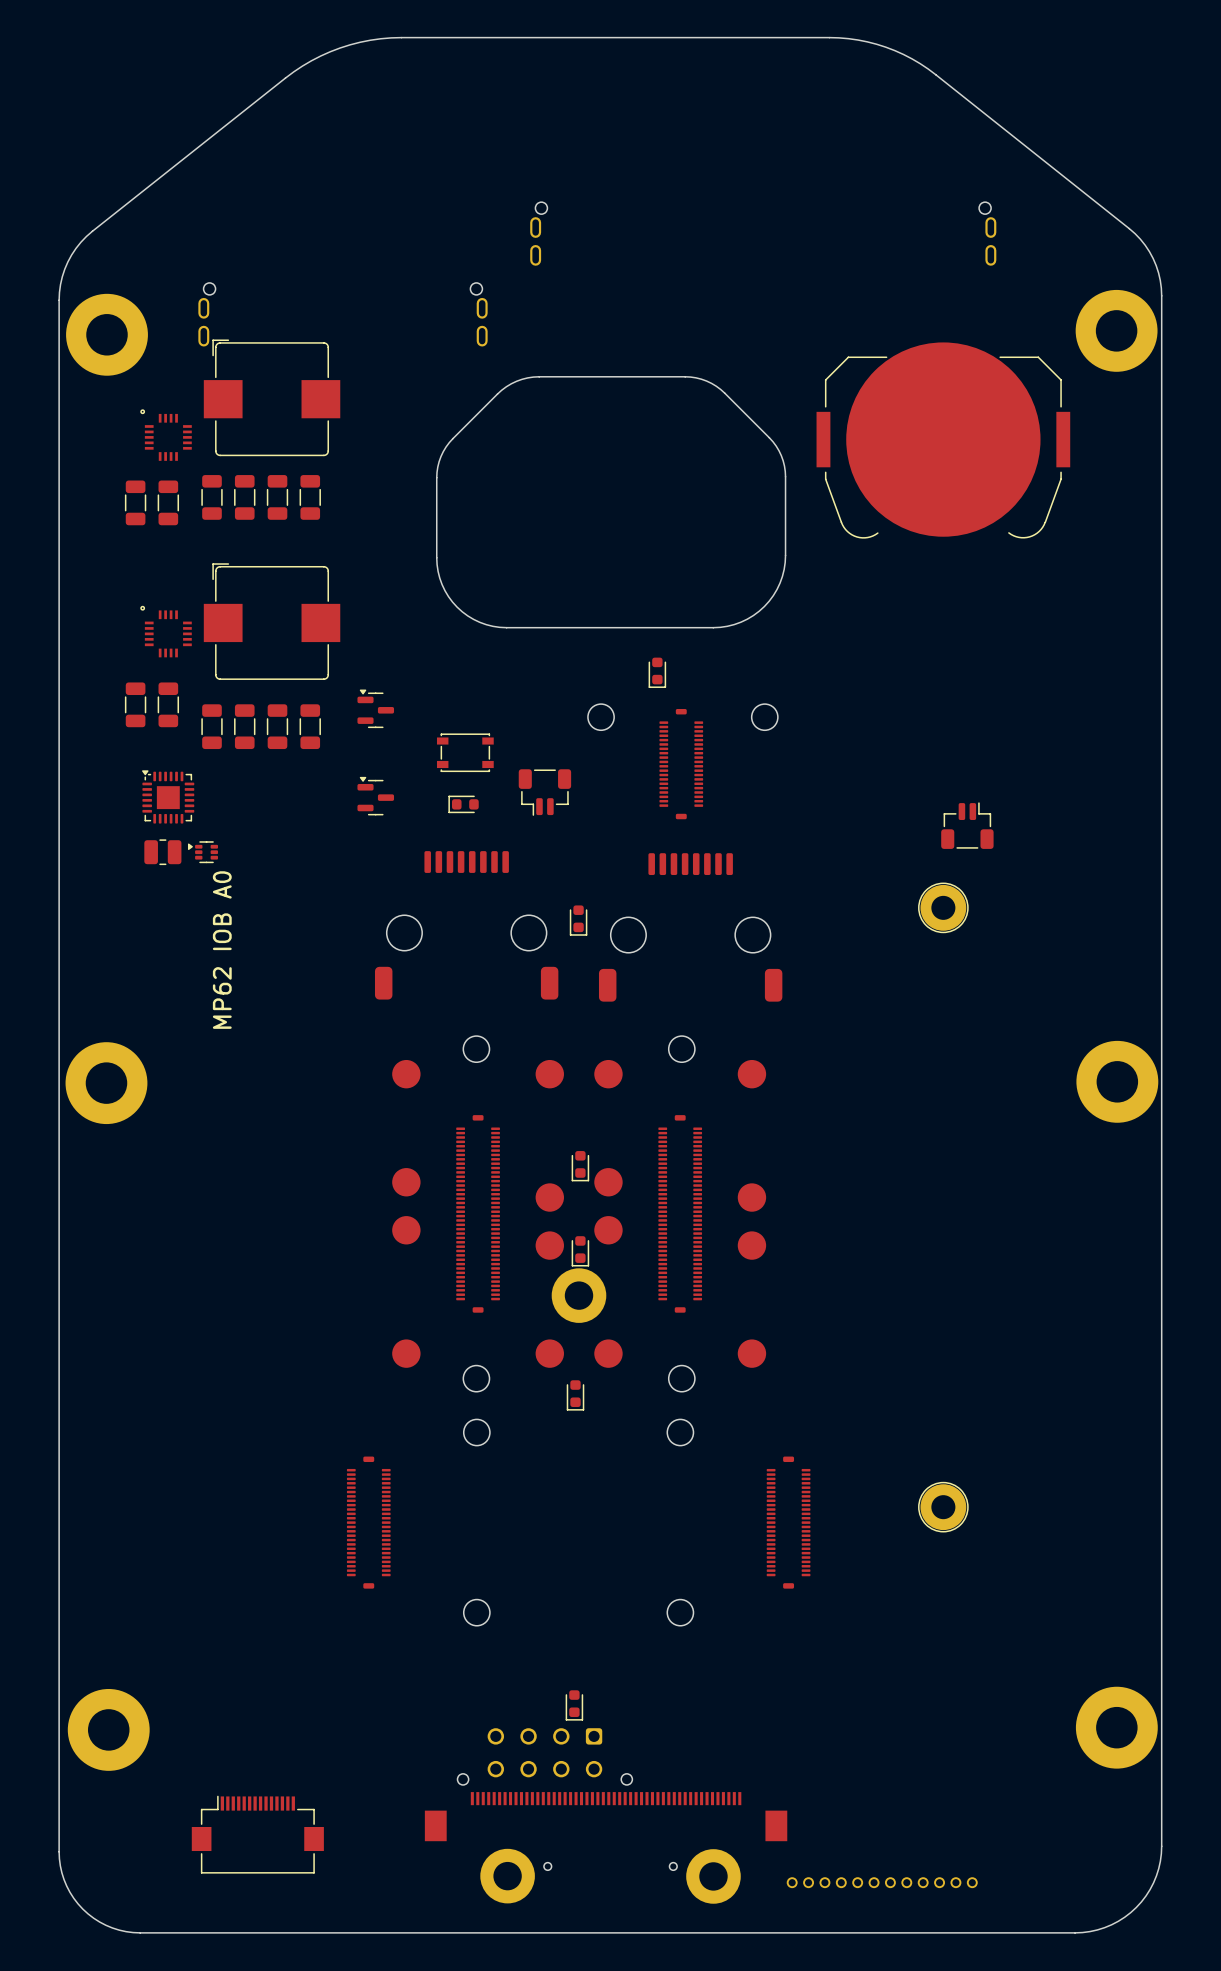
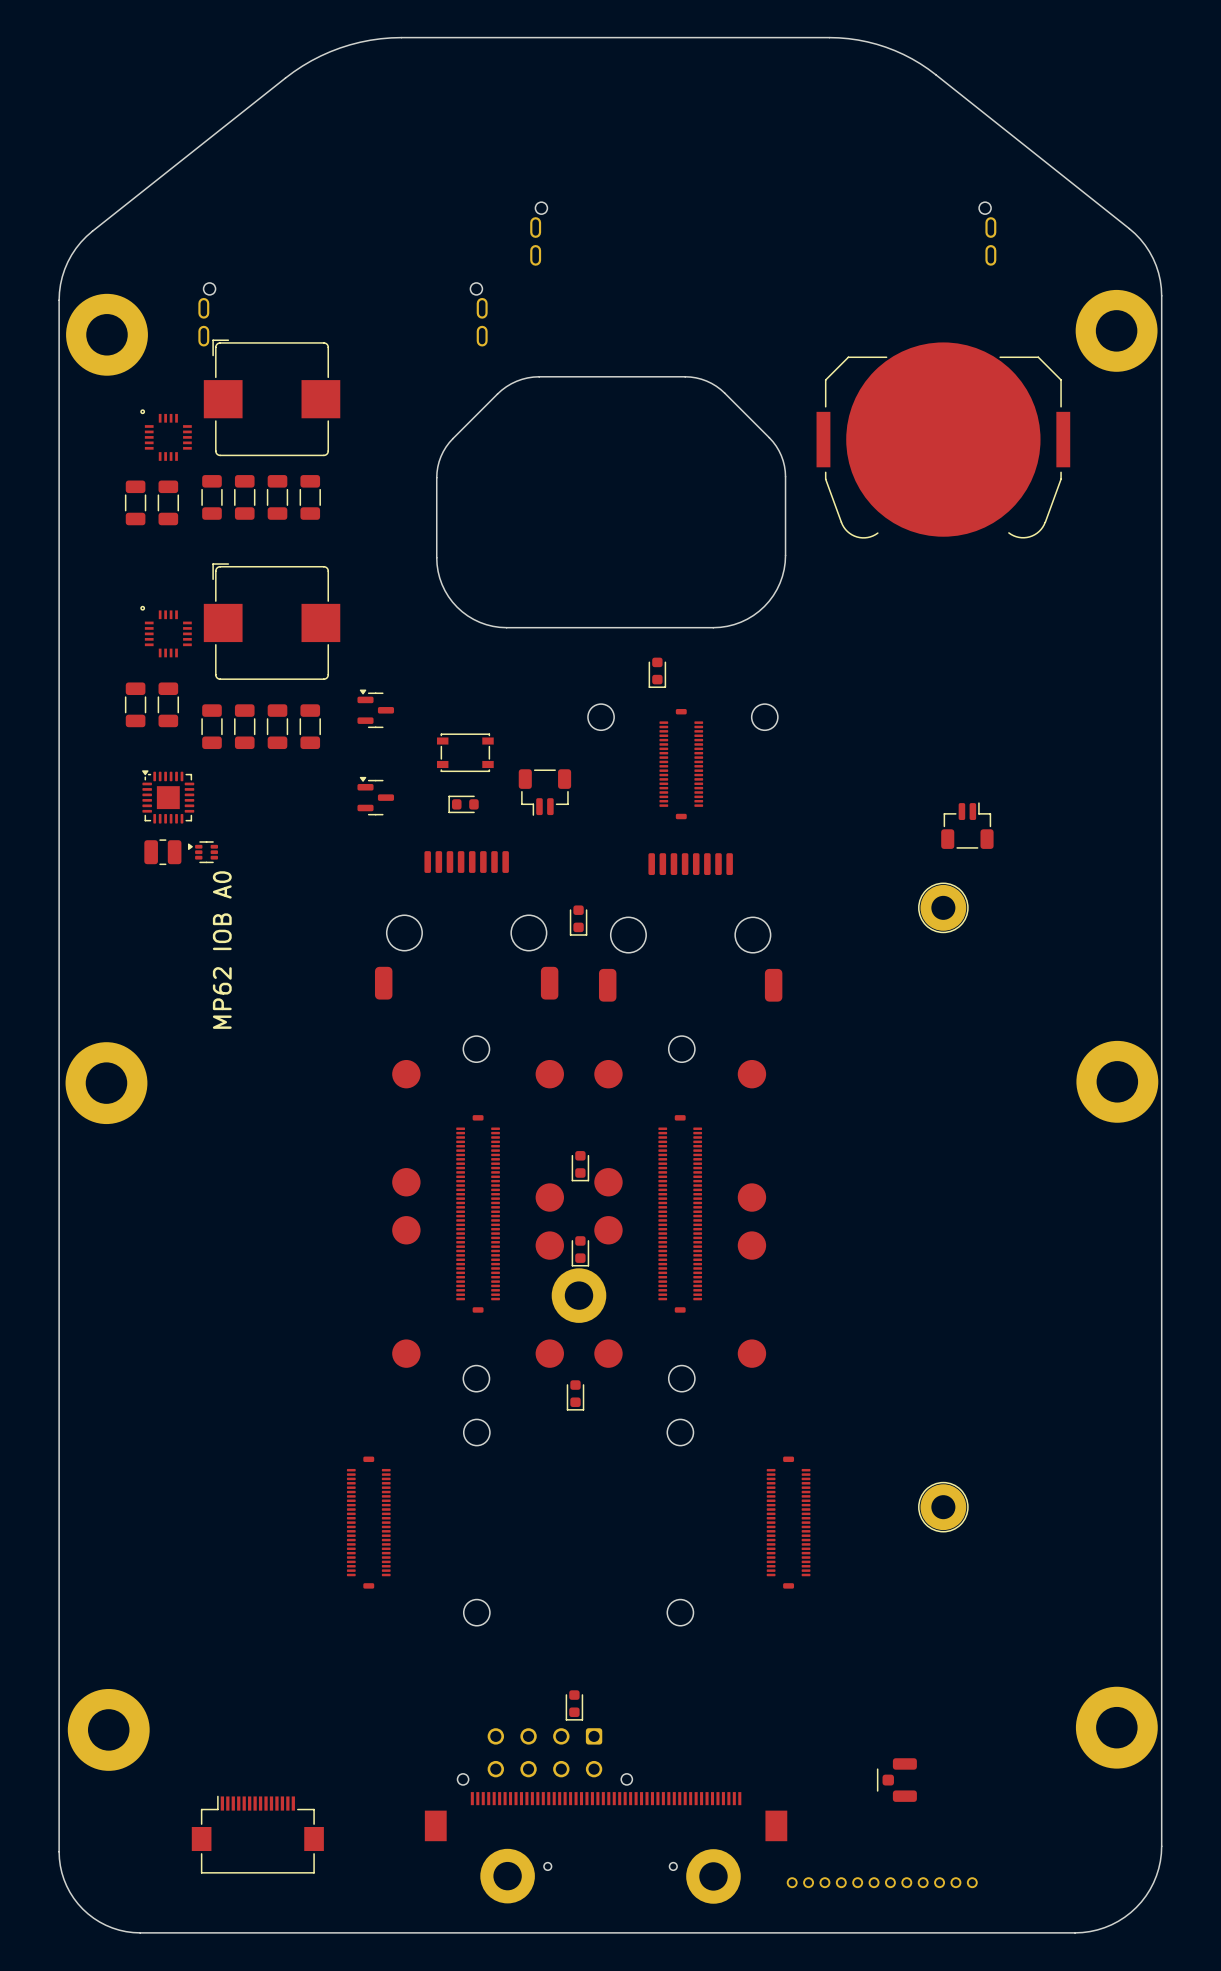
part: none -> (896, 1780)

